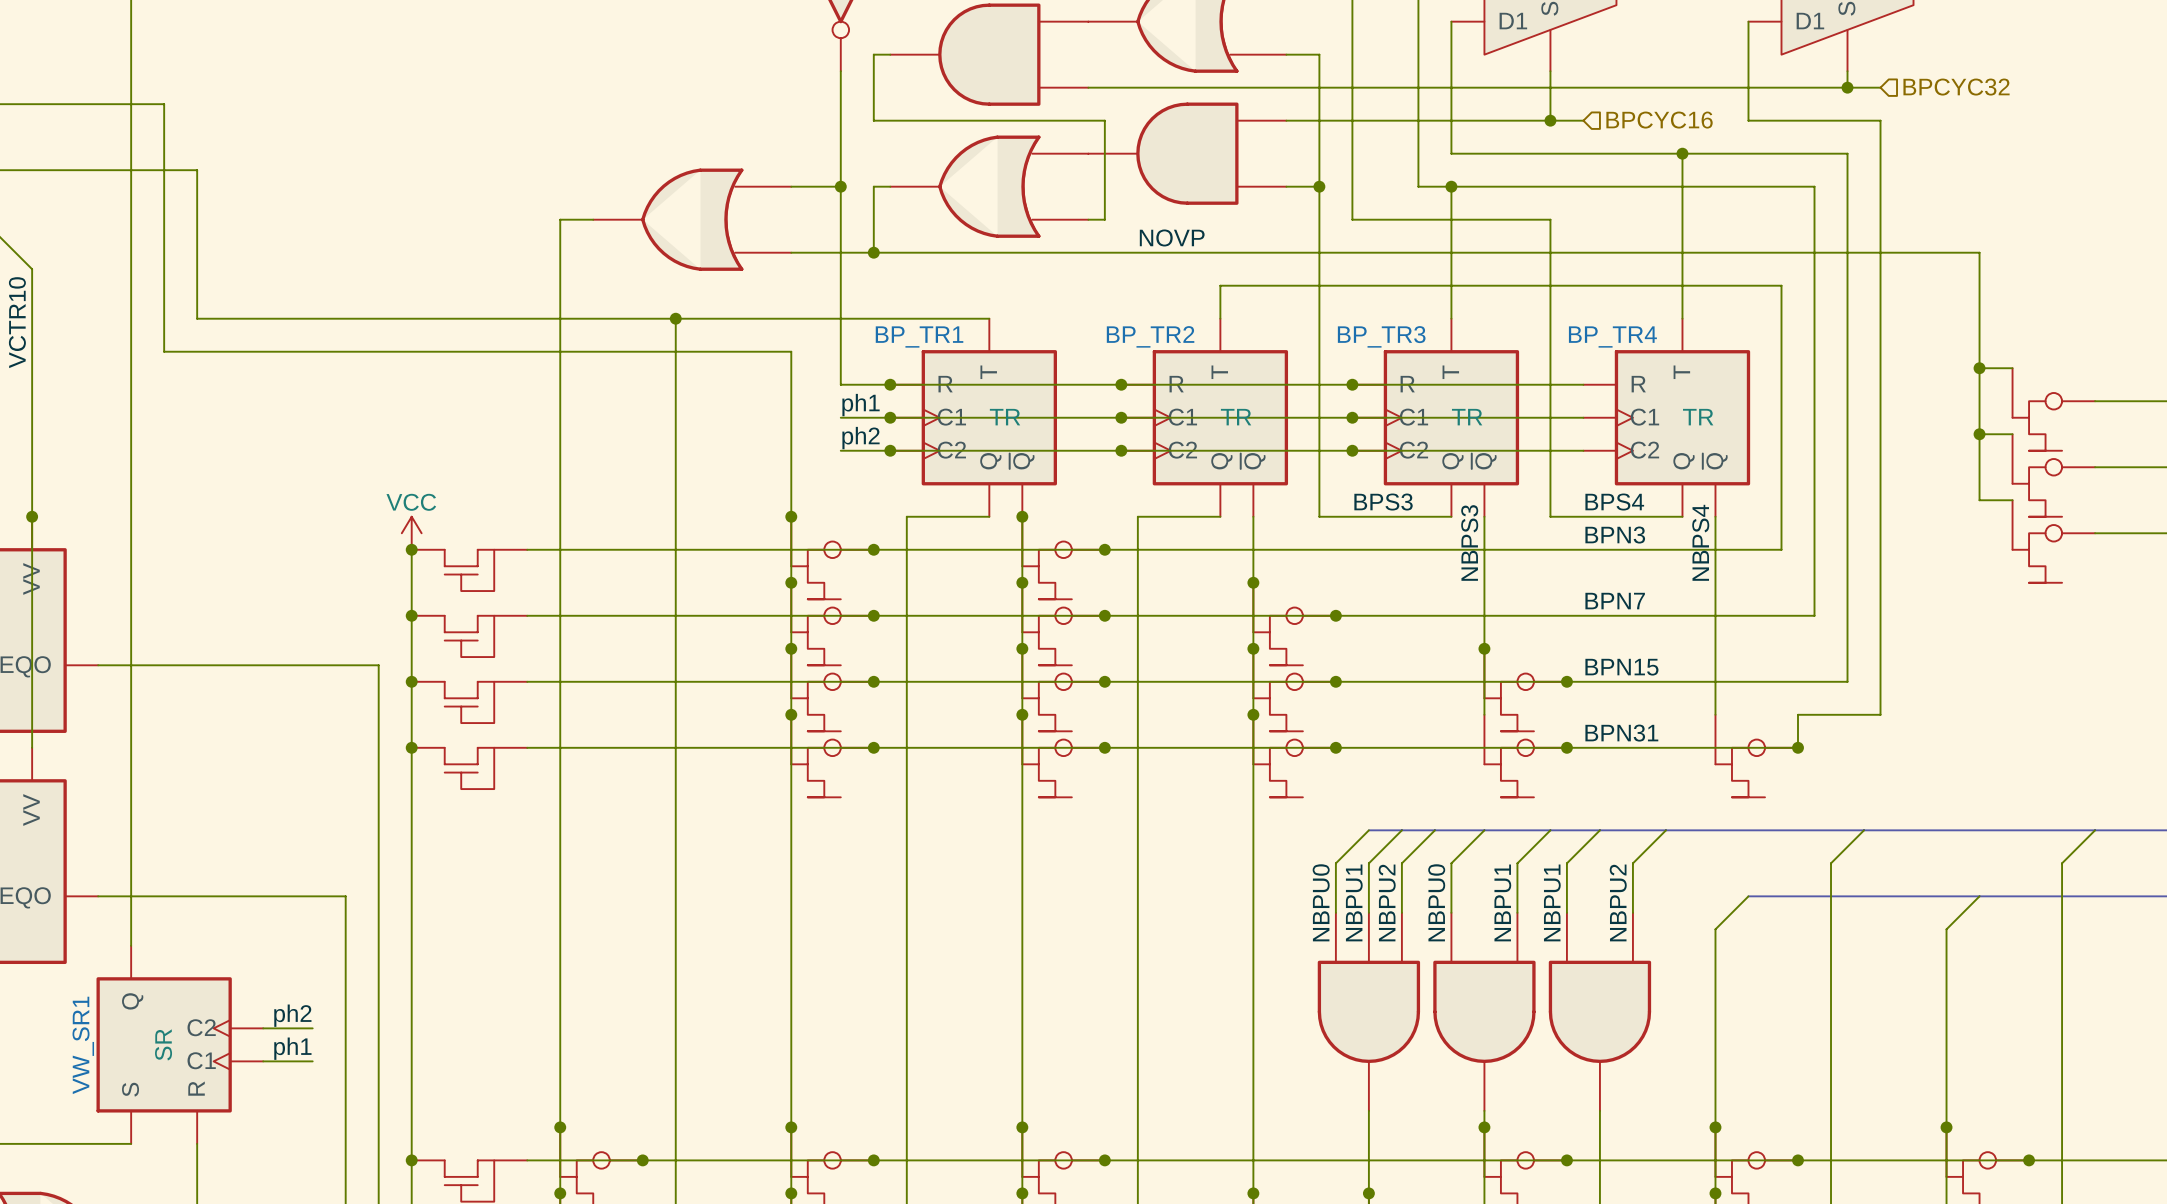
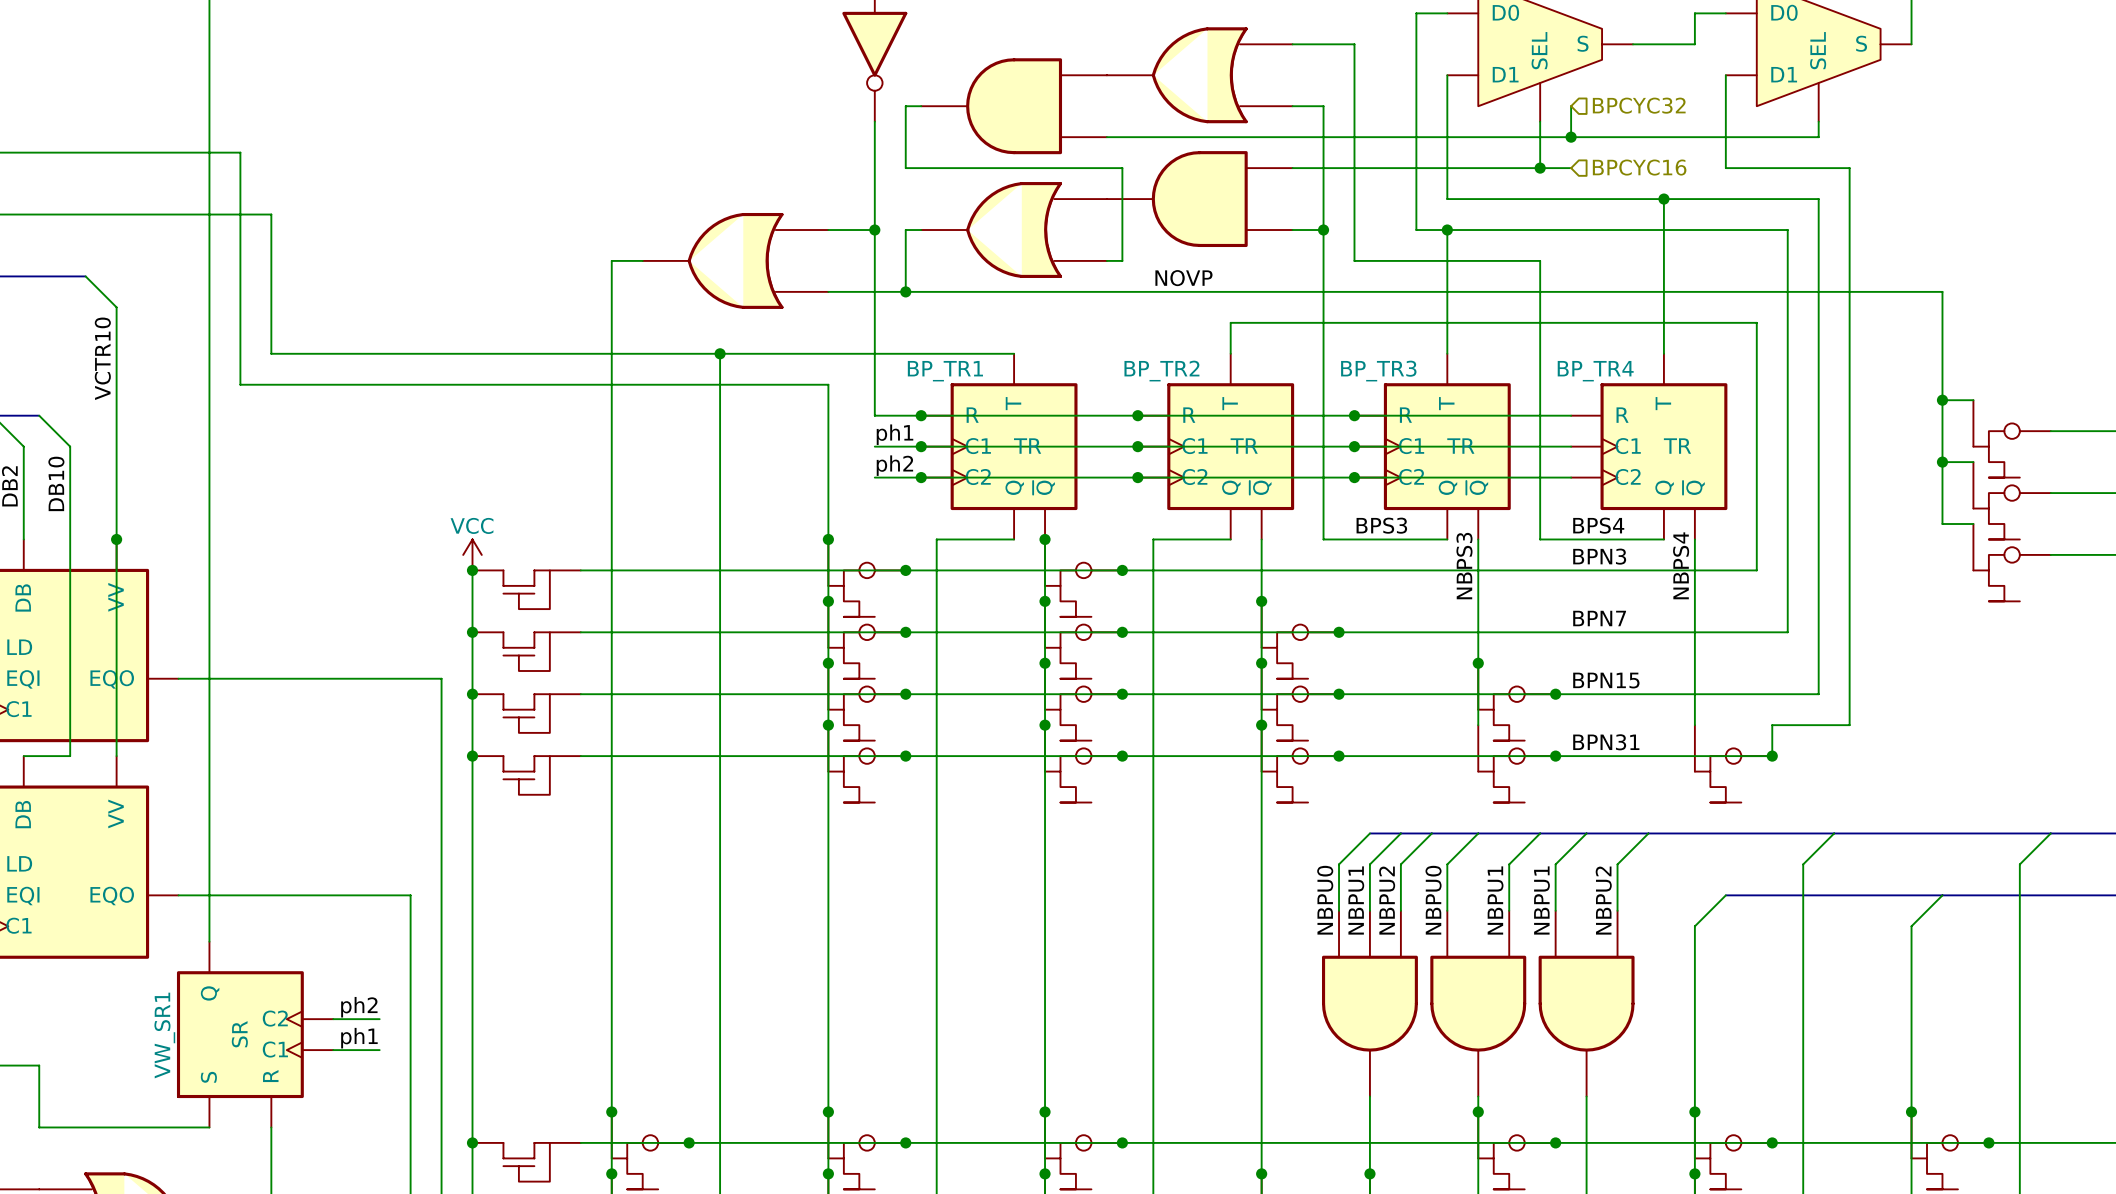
wire: none -> (1571, 106) (1571, 137)
junction: none -> (1571, 137)
wire: (1847, 87) (1880, 87) -> none
junction: (1847, 87) -> none
hierarchical label position: BPCYC32 (1956, 87) -> BPCYC32 (1639, 105)

